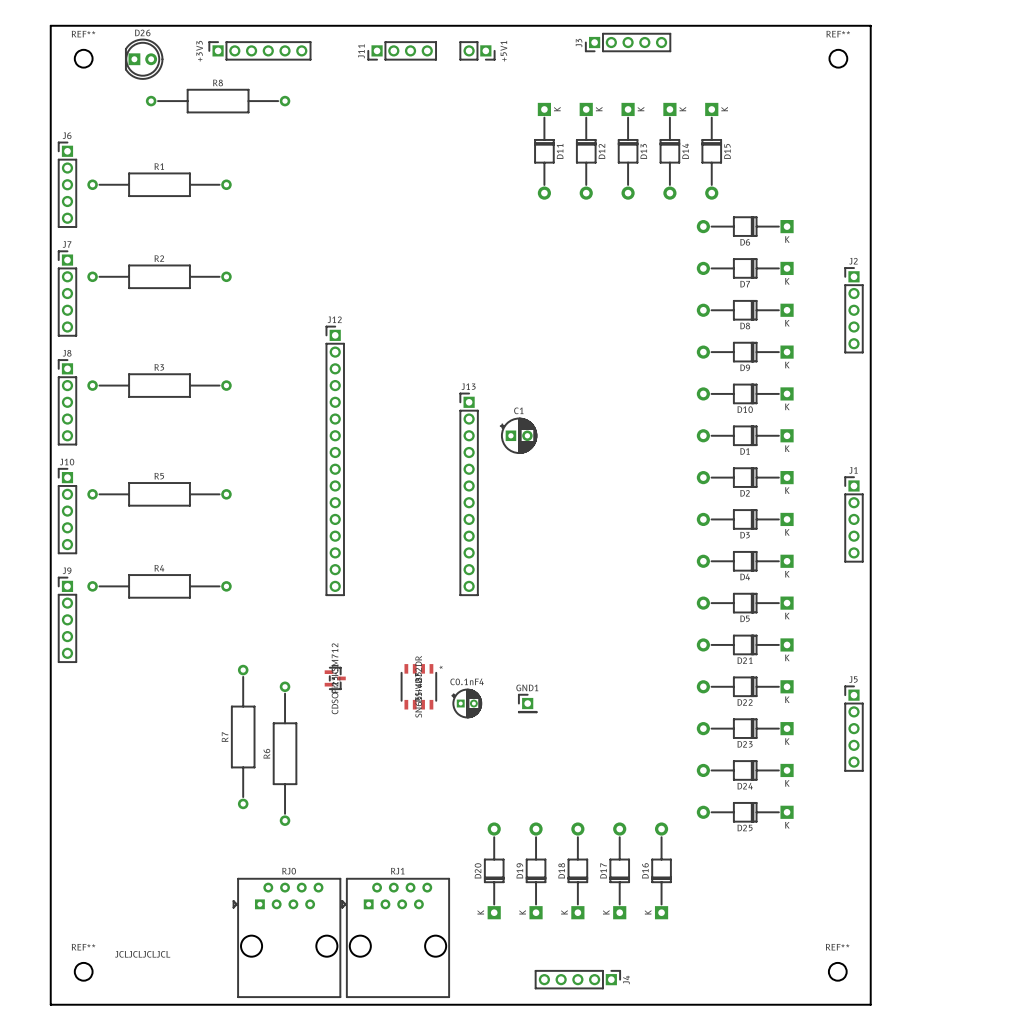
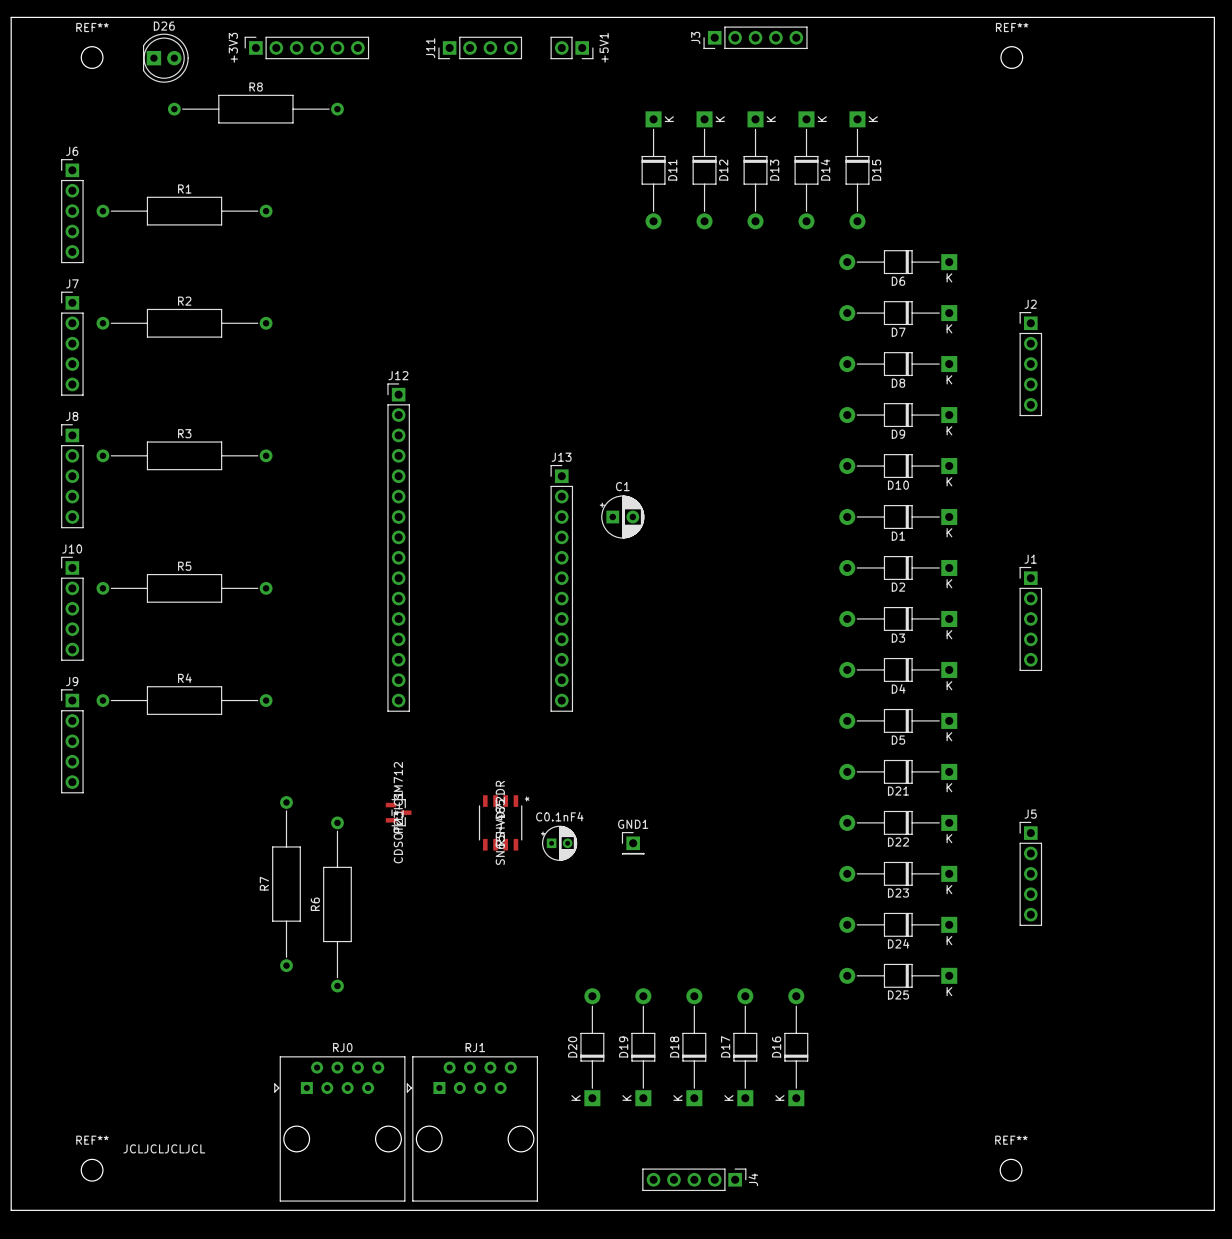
board edge: (50, 25) (50, 1004) -> (51, 17) (11, 17) (11, 1210) (51, 1210)
board edge: (870, 25) (870, 1004) -> (1051, 17) (1214, 17) (1214, 1210) (1051, 1210)

